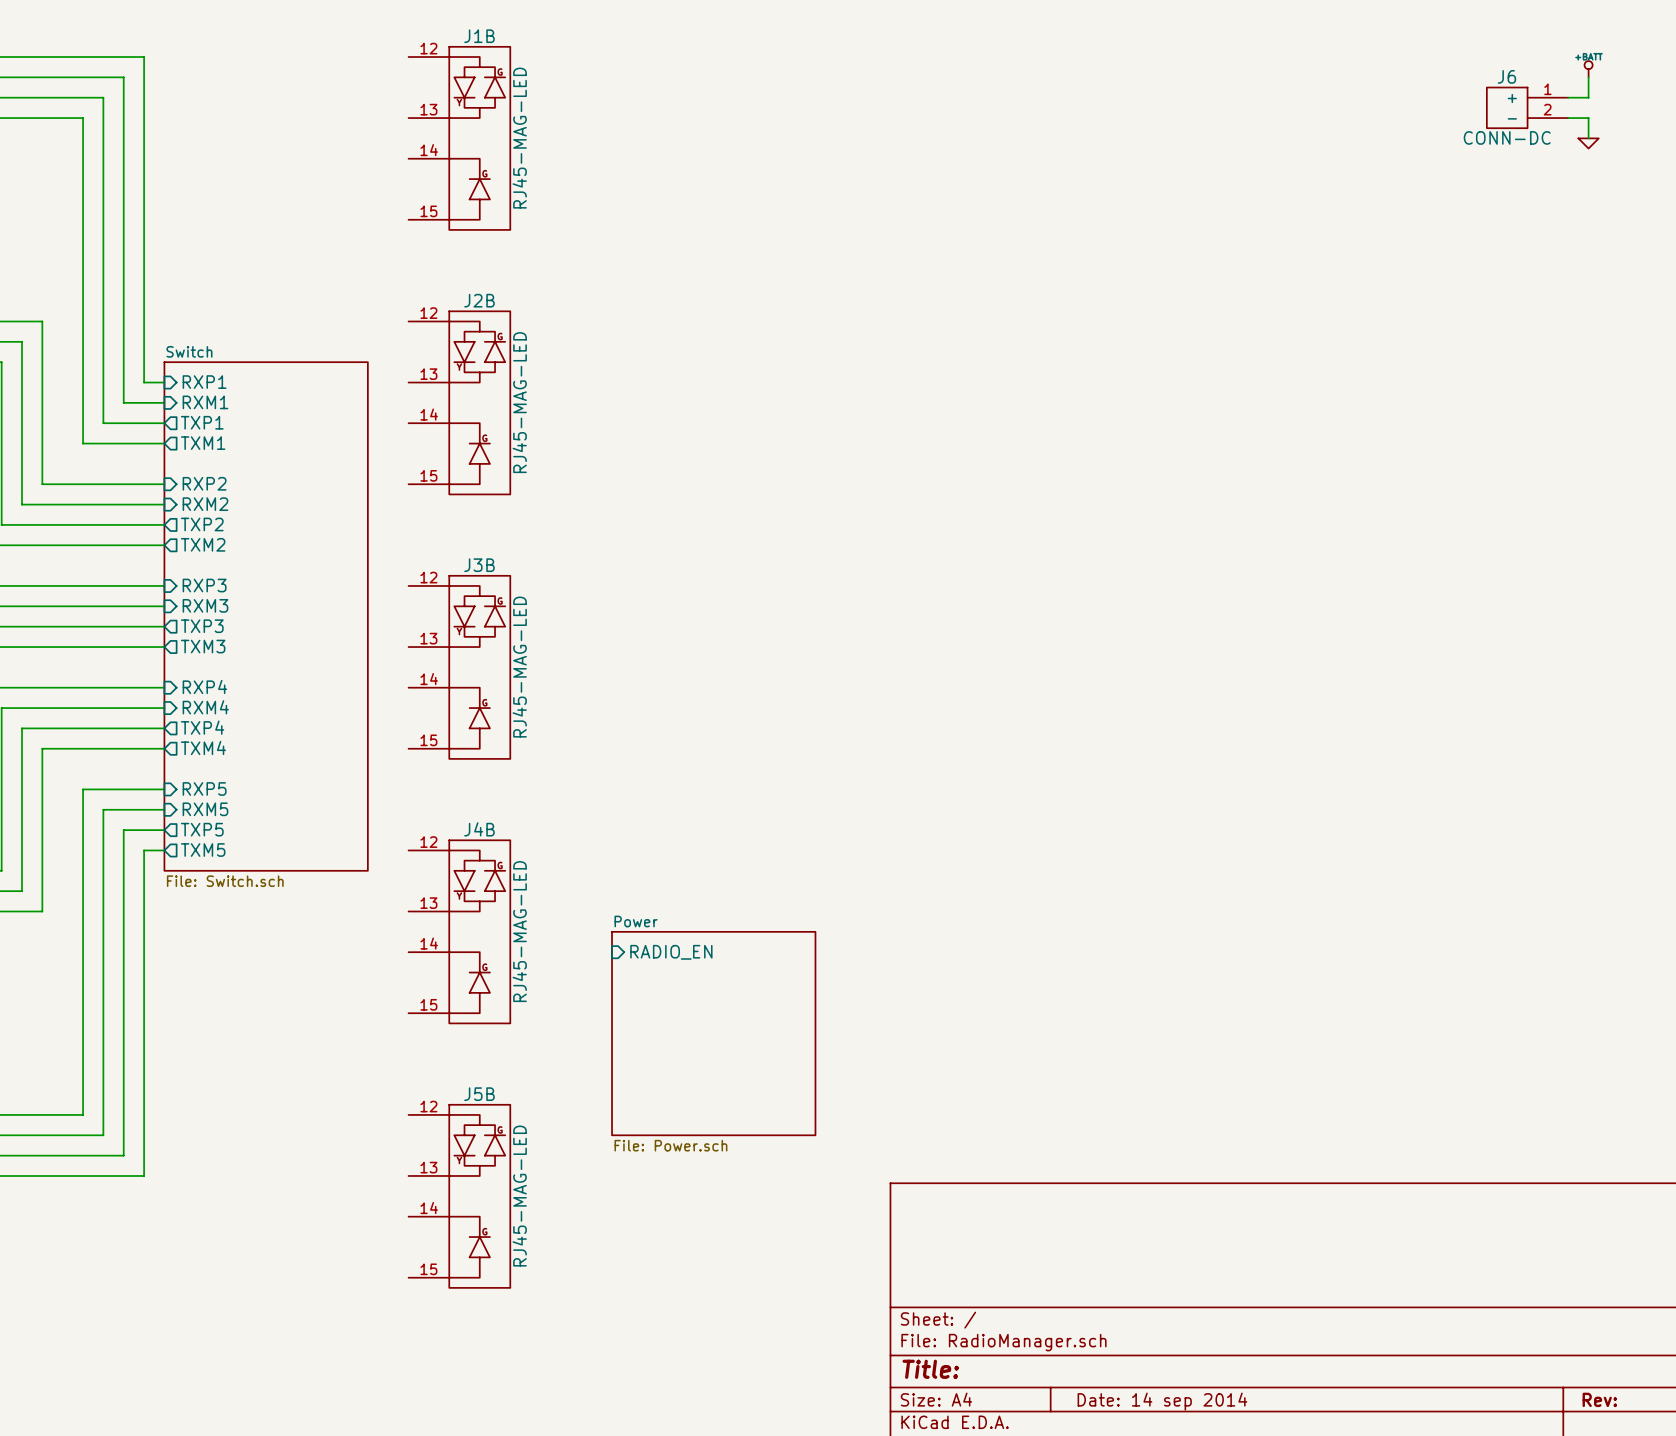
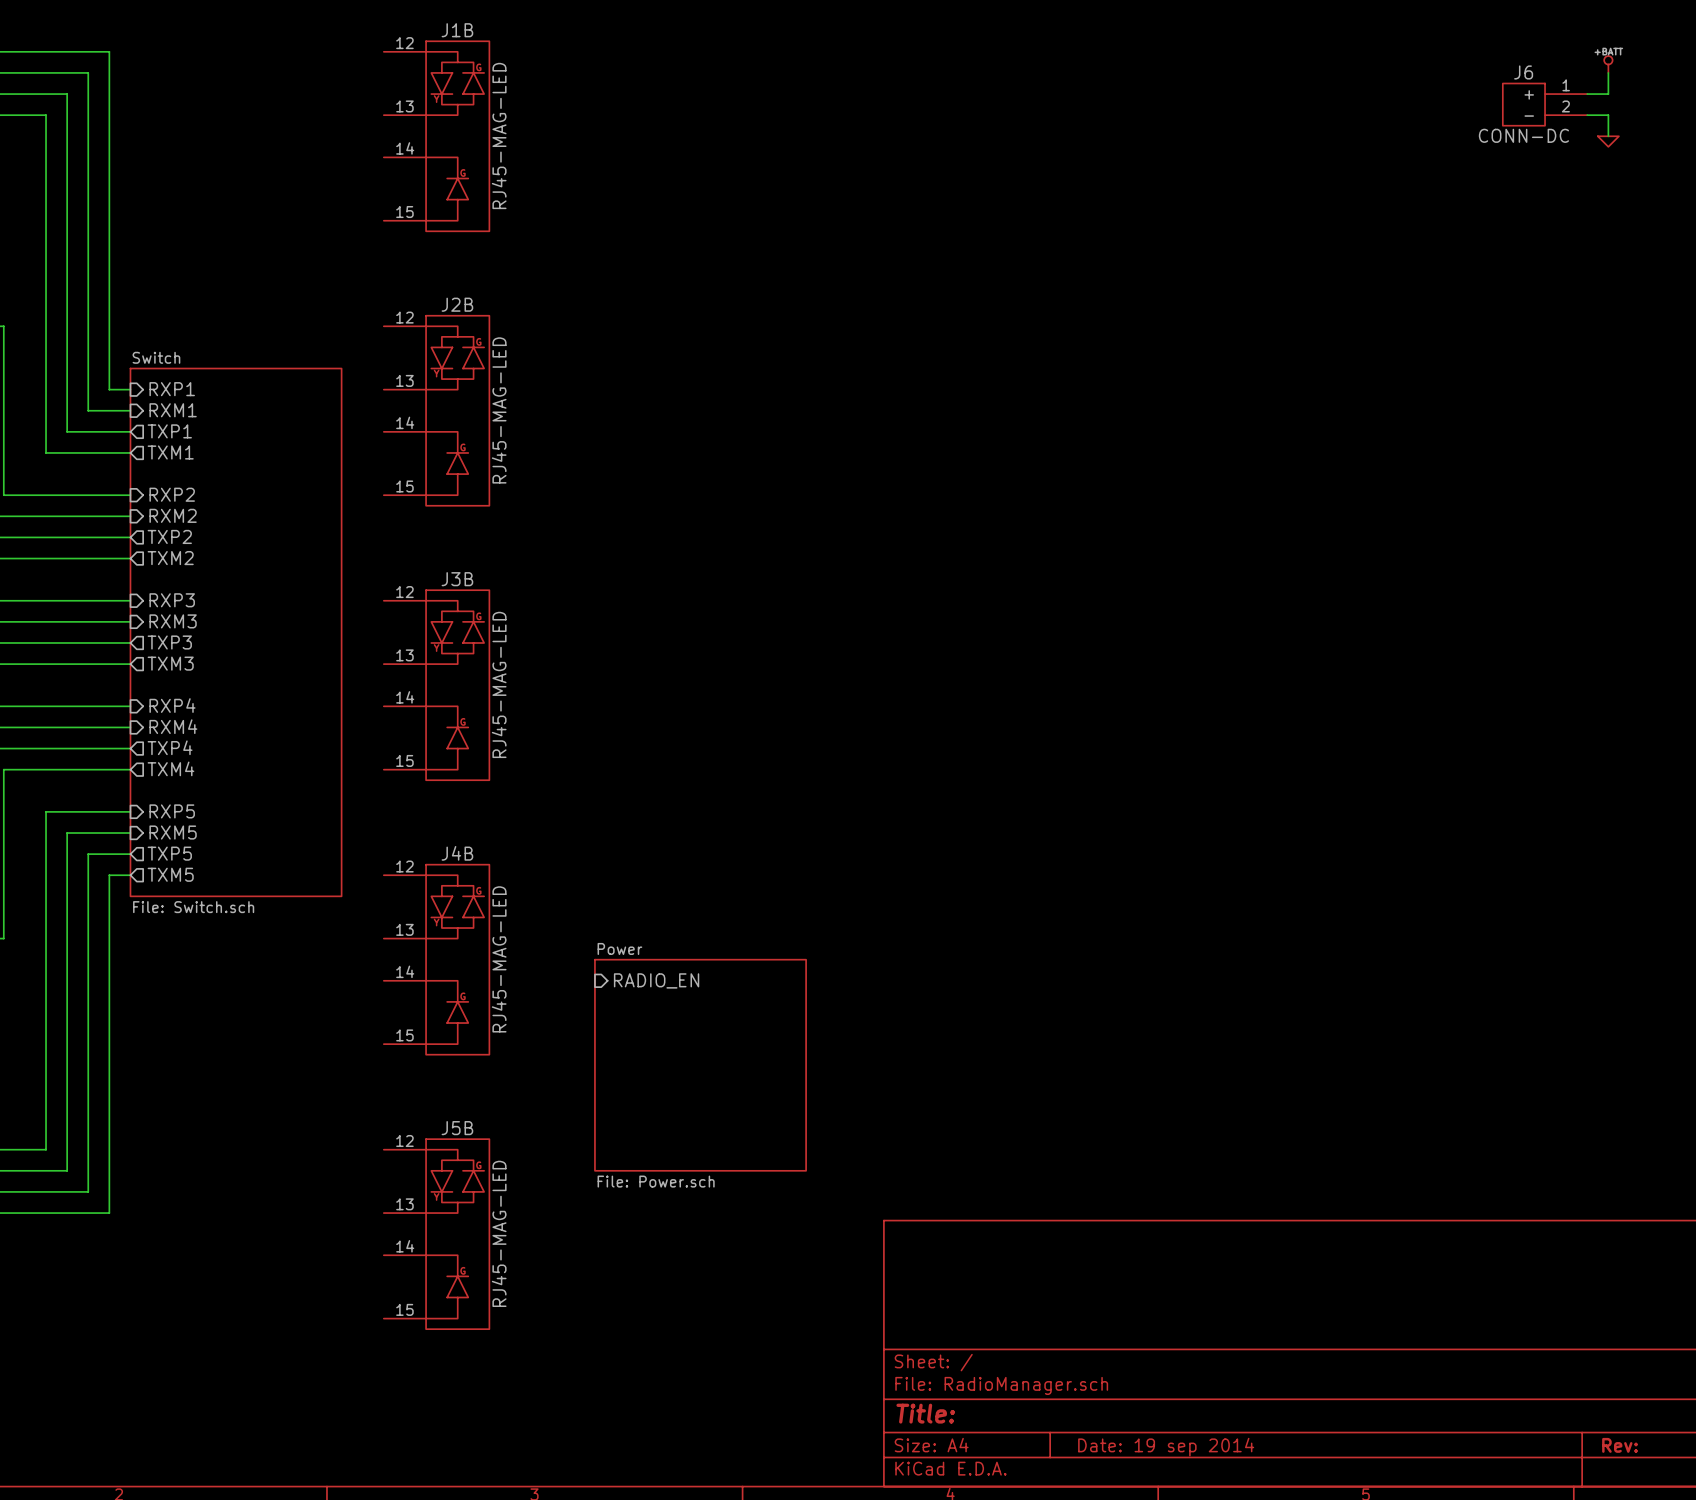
title block: Date: 14 sep 2014 (1162, 1401) -> Date: 19 sep 2014 (1166, 1447)

